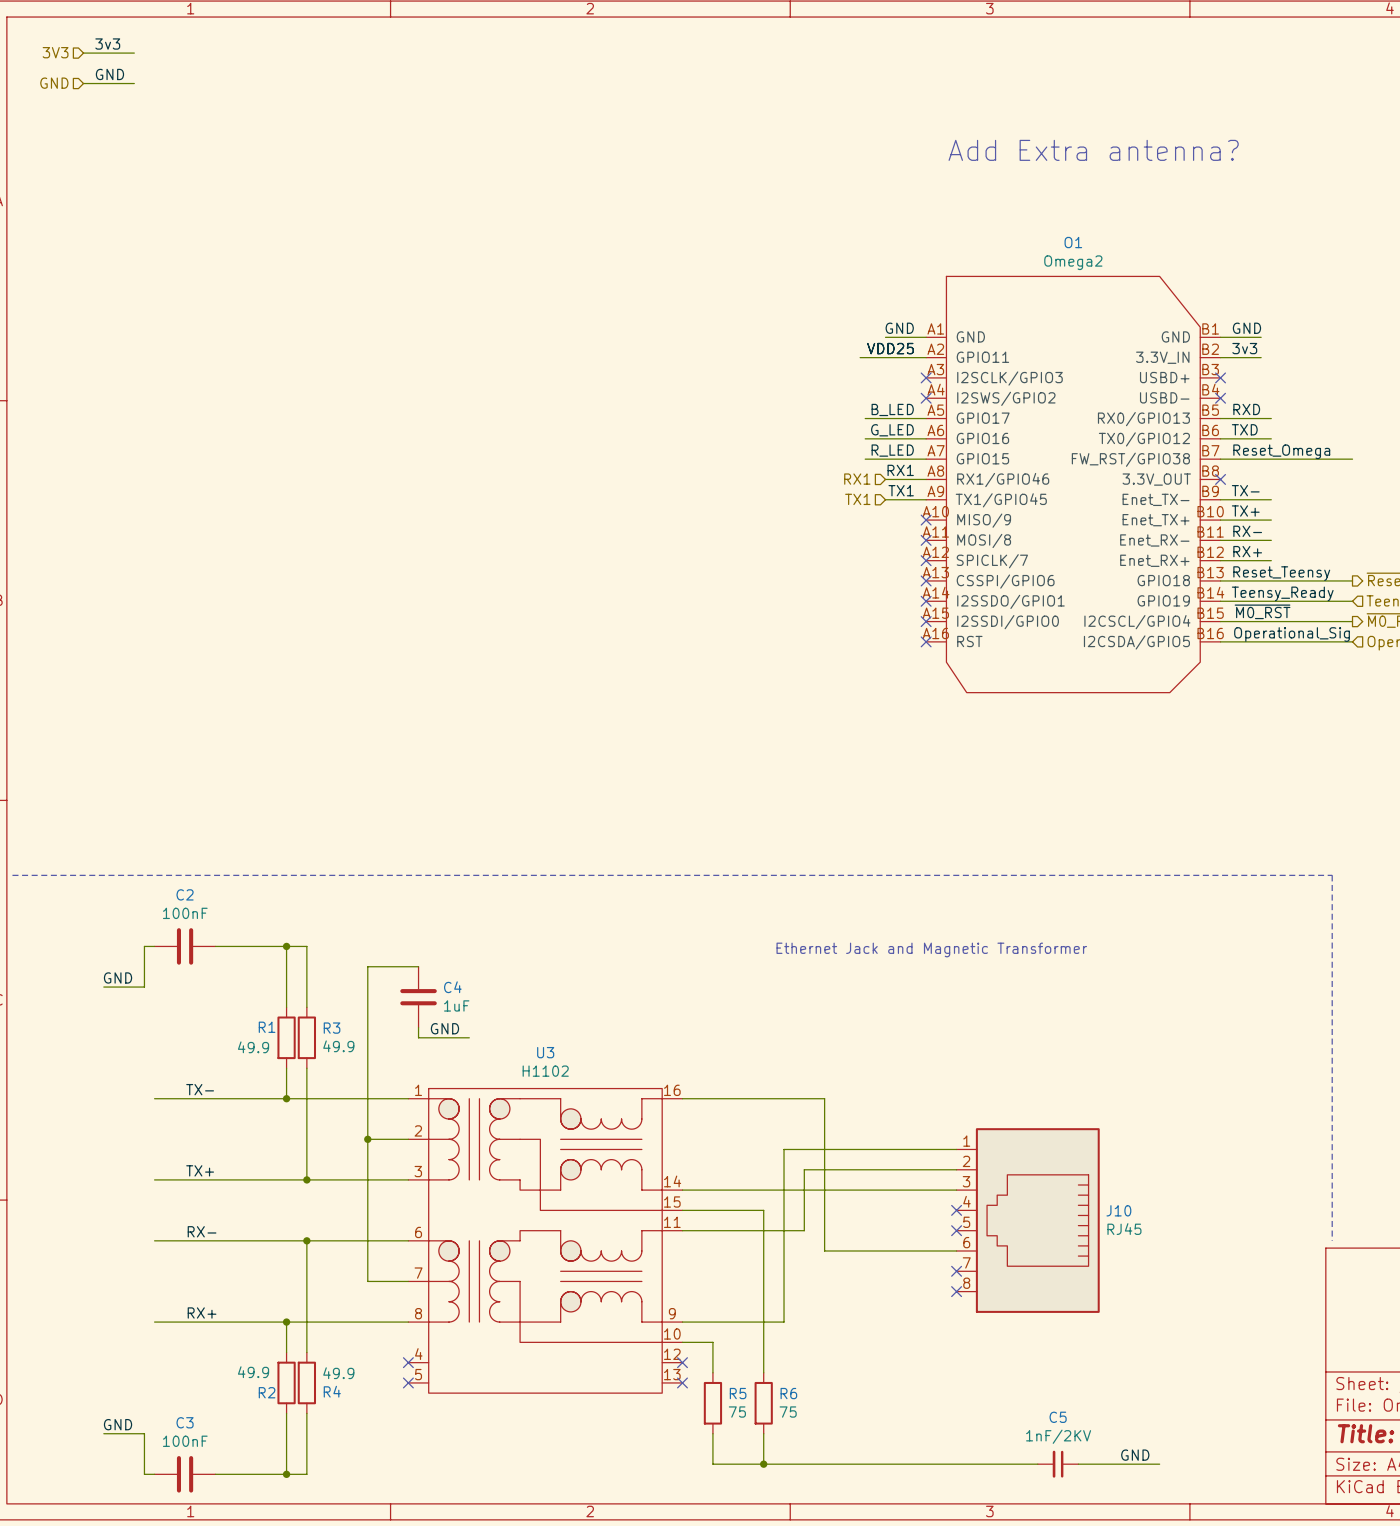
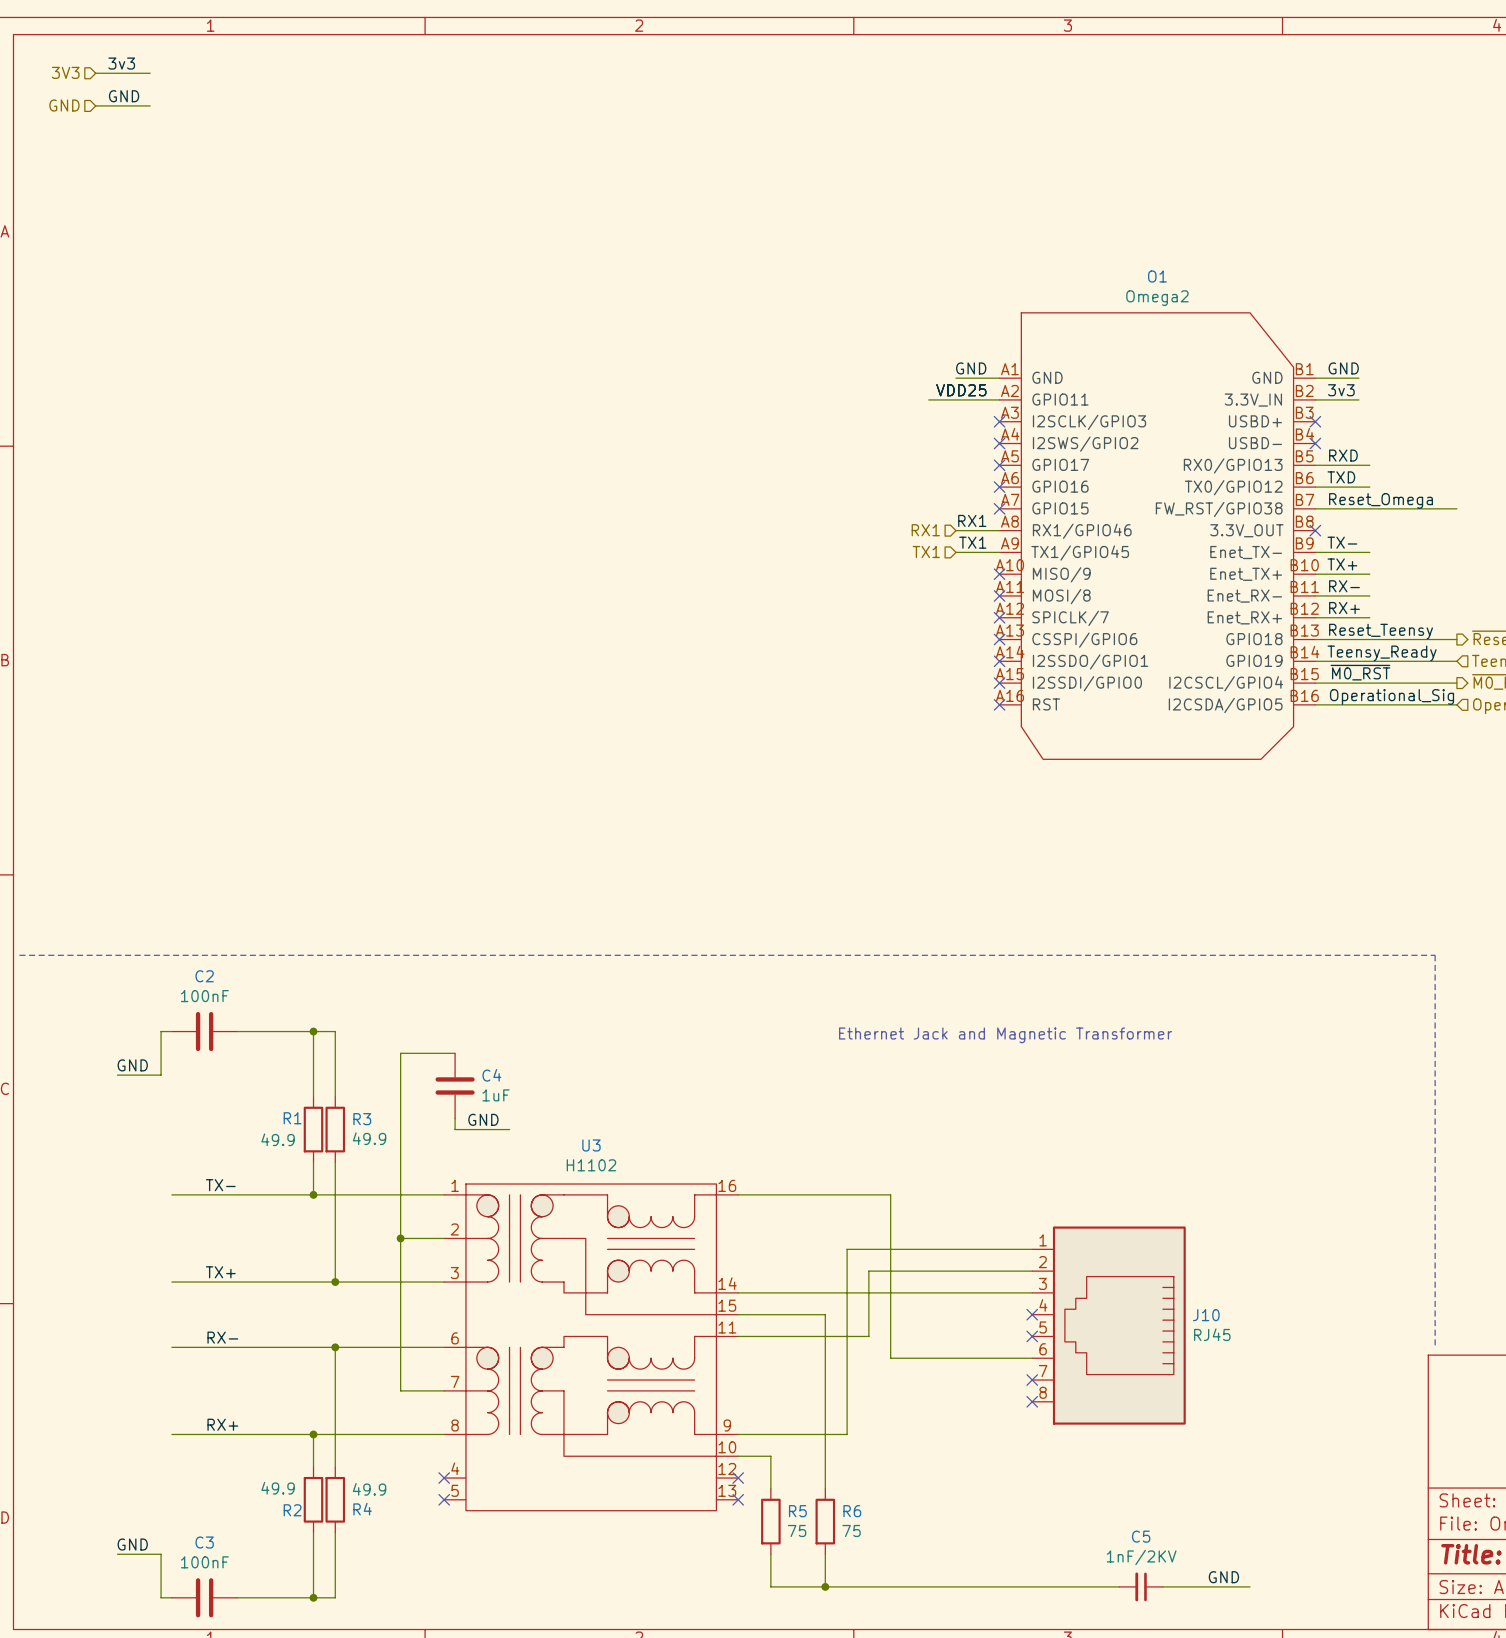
text: Add Extra antenna? (1093, 150) -> none
label: B_LED (892, 409) -> none
wire: (865, 418) (926, 418) -> none
no-connect mark: none -> (999, 465)
label: G_LED (892, 430) -> none
wire: (865, 438) (926, 438) -> none
no-connect mark: none -> (999, 487)
label: R_LED (892, 450) -> none
wire: (865, 459) (926, 459) -> none
no-connect mark: none -> (999, 508)

